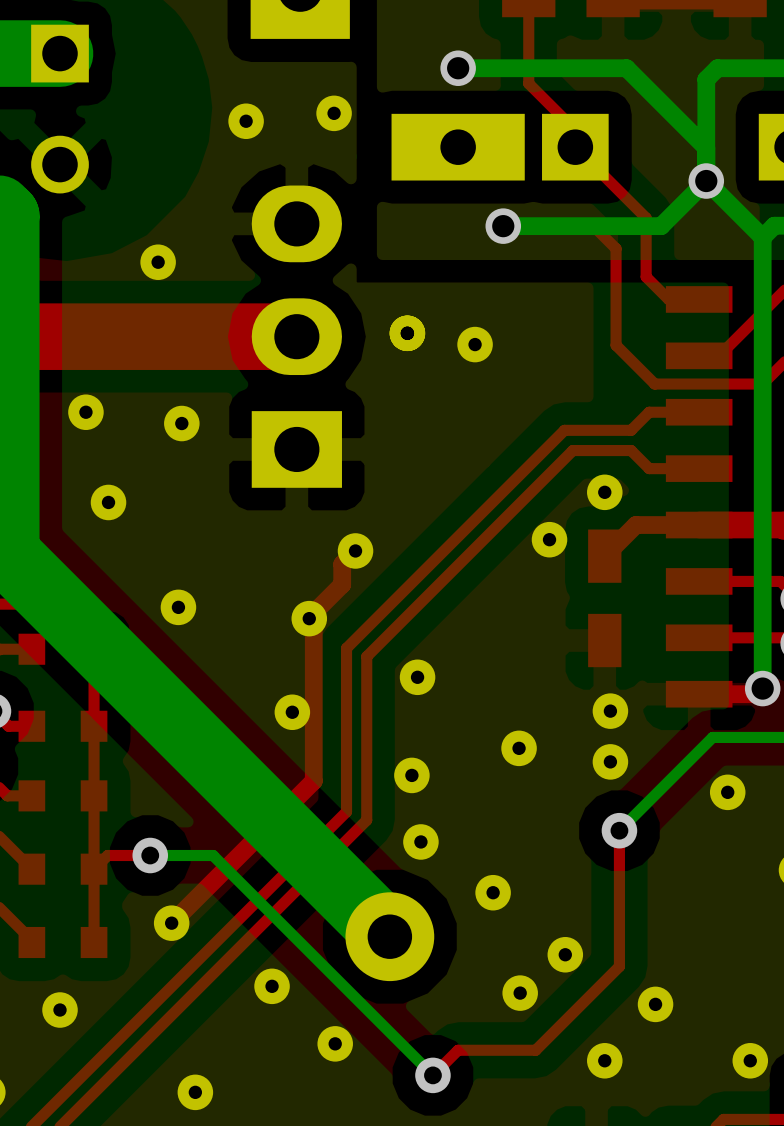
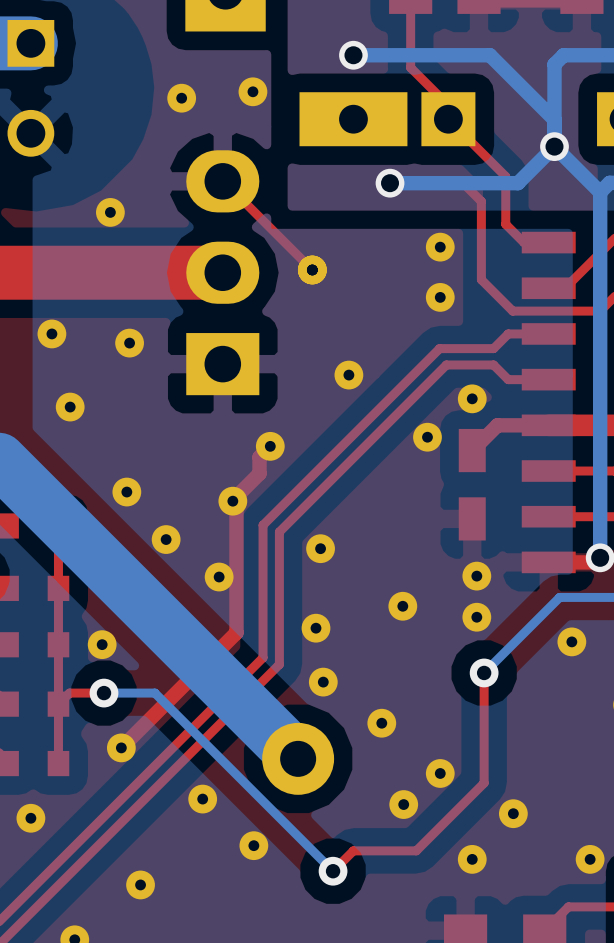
top track: none -> (222, 181) (312, 269)
part: none -> (440, 247)
part: (475, 344) -> none
part: none -> (440, 297)
part: none -> (348, 375)
part: none -> (166, 539)
part: none -> (102, 644)

